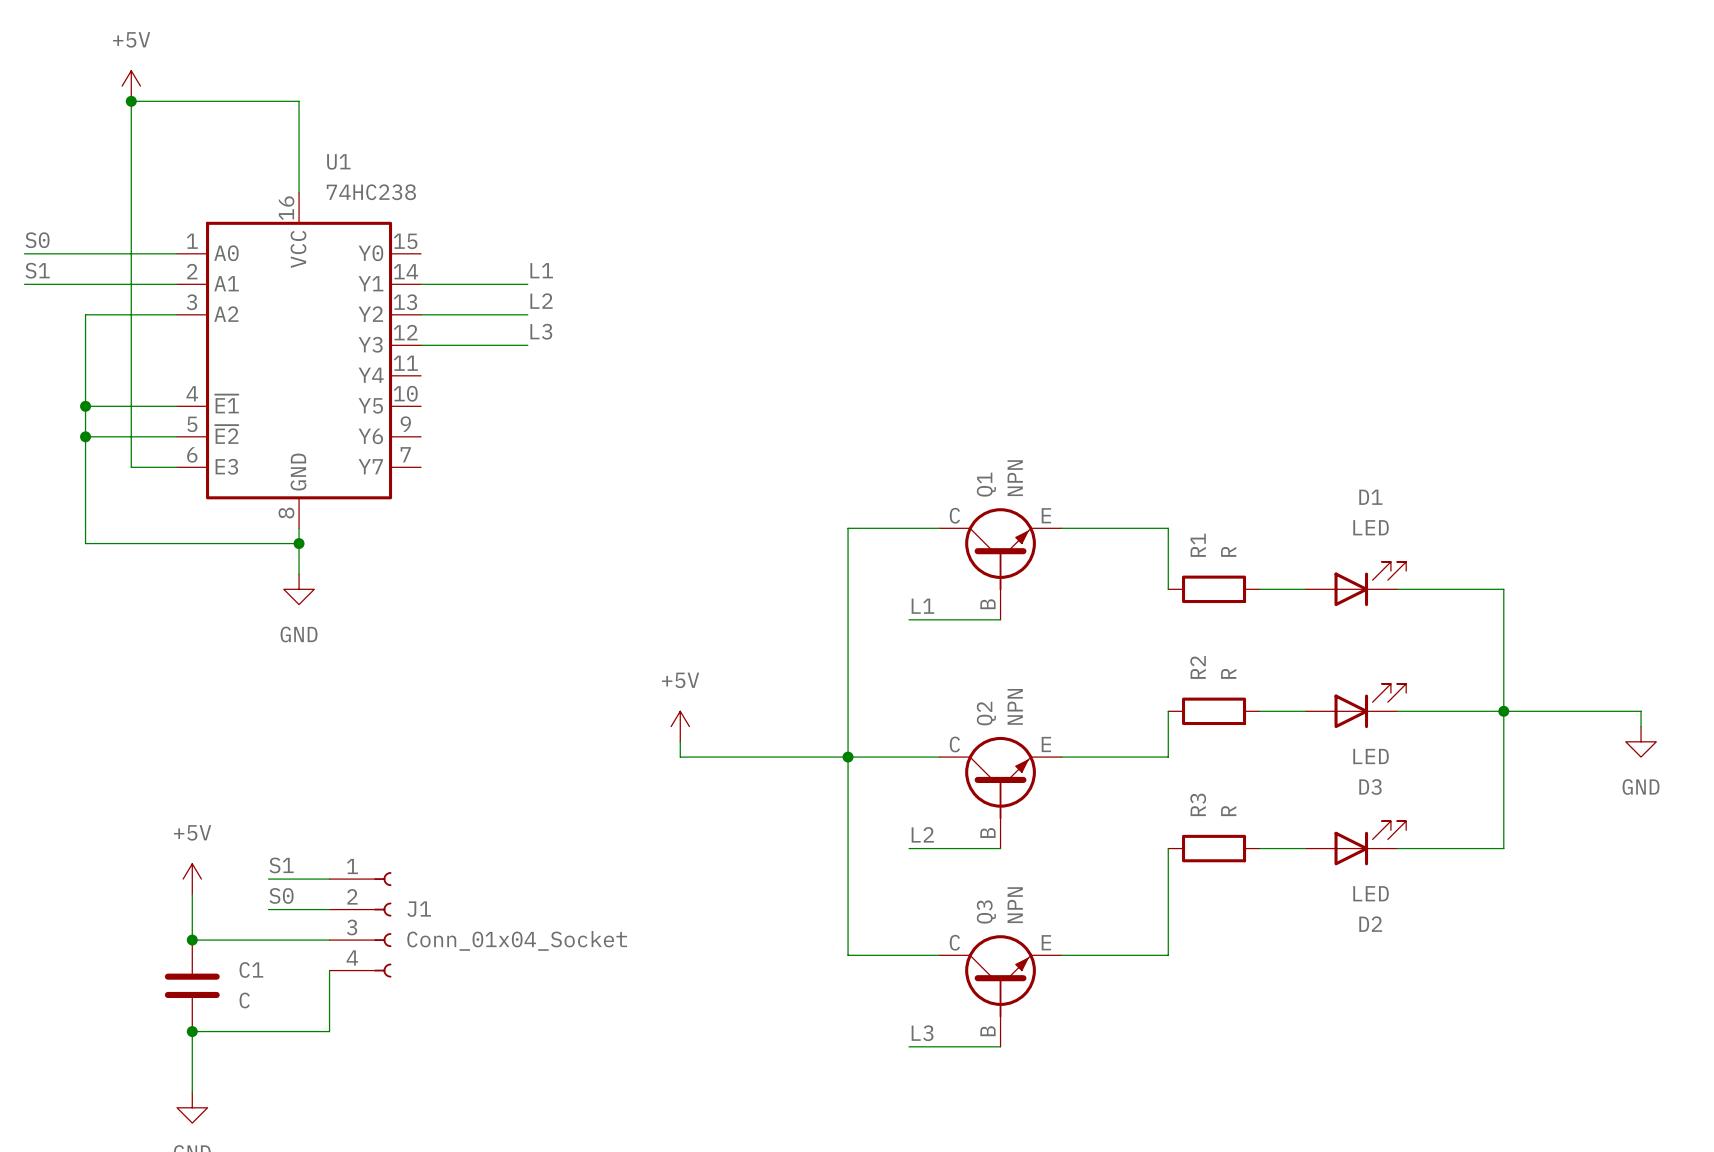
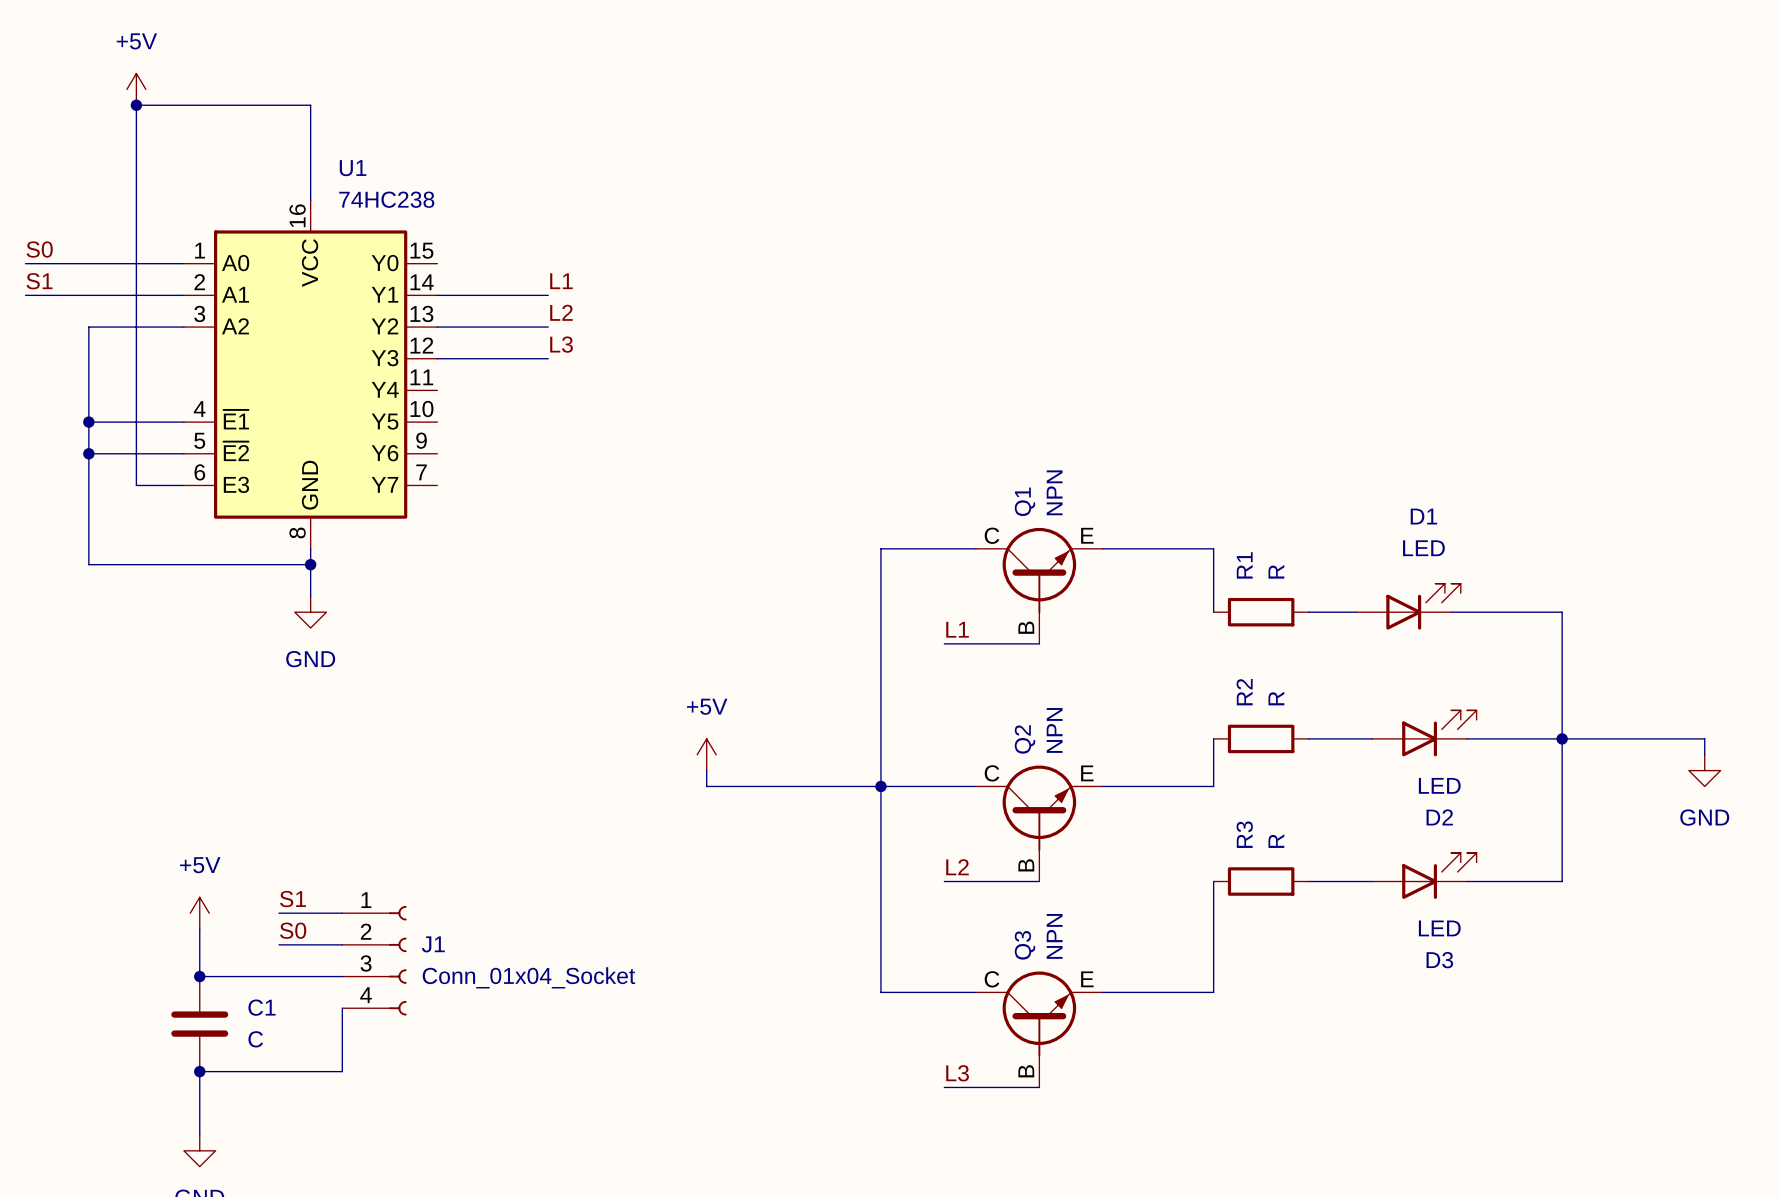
D3 position: (1355, 705) -> (1424, 875)
D2 position: (1355, 843) -> (1424, 733)

